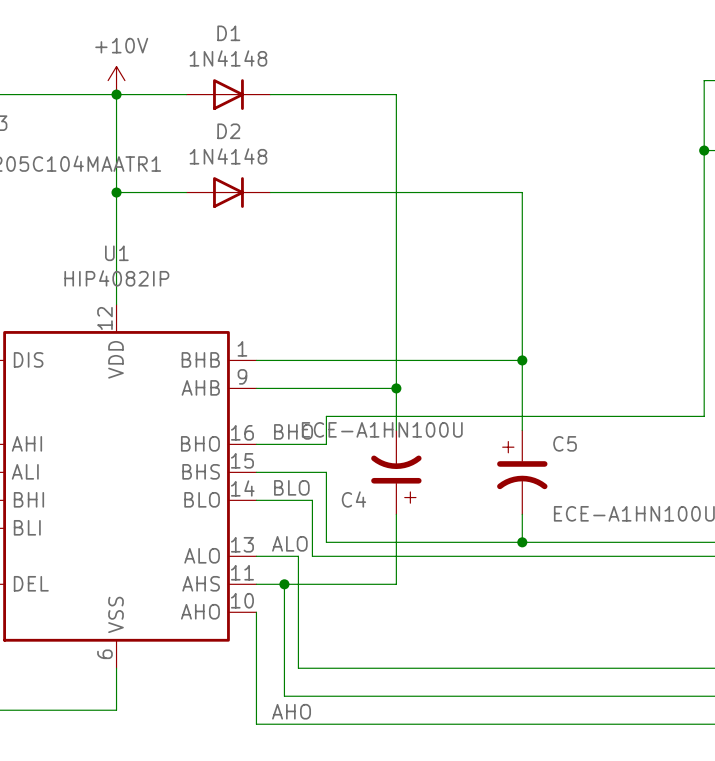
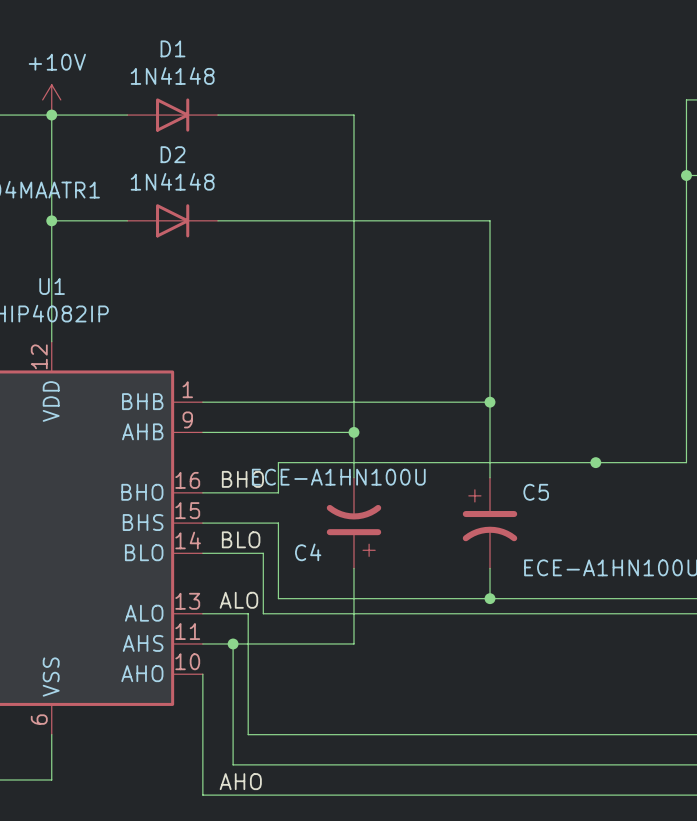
junction: none -> (595, 462)

